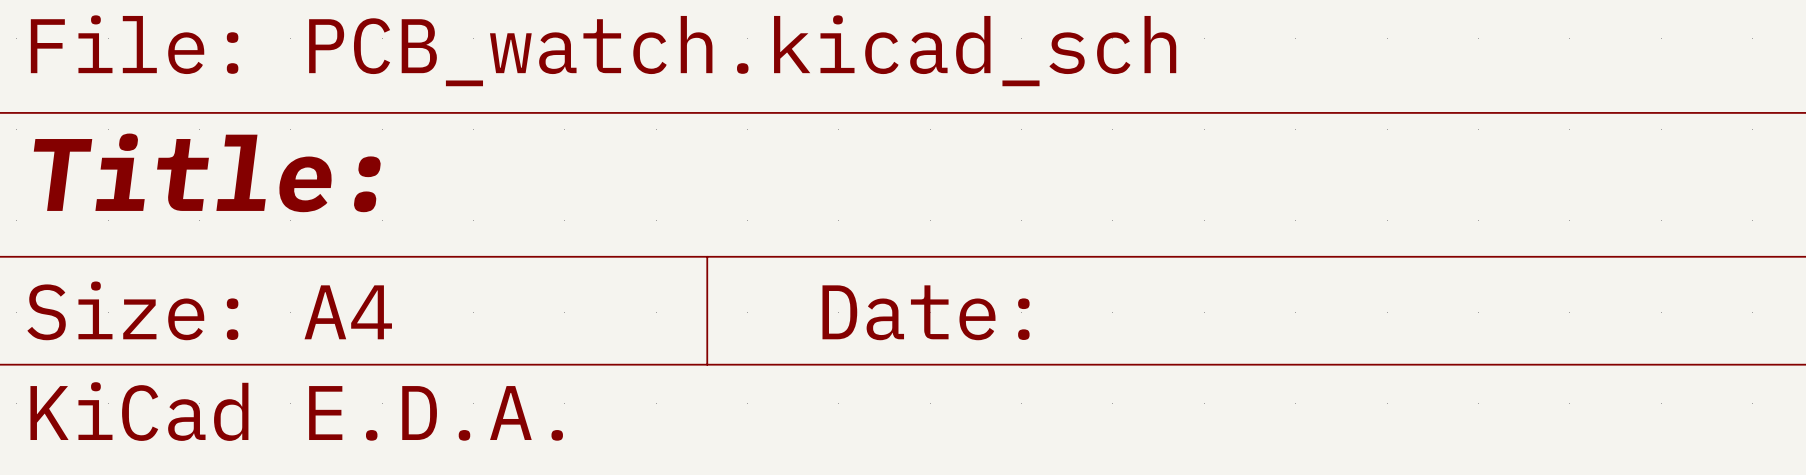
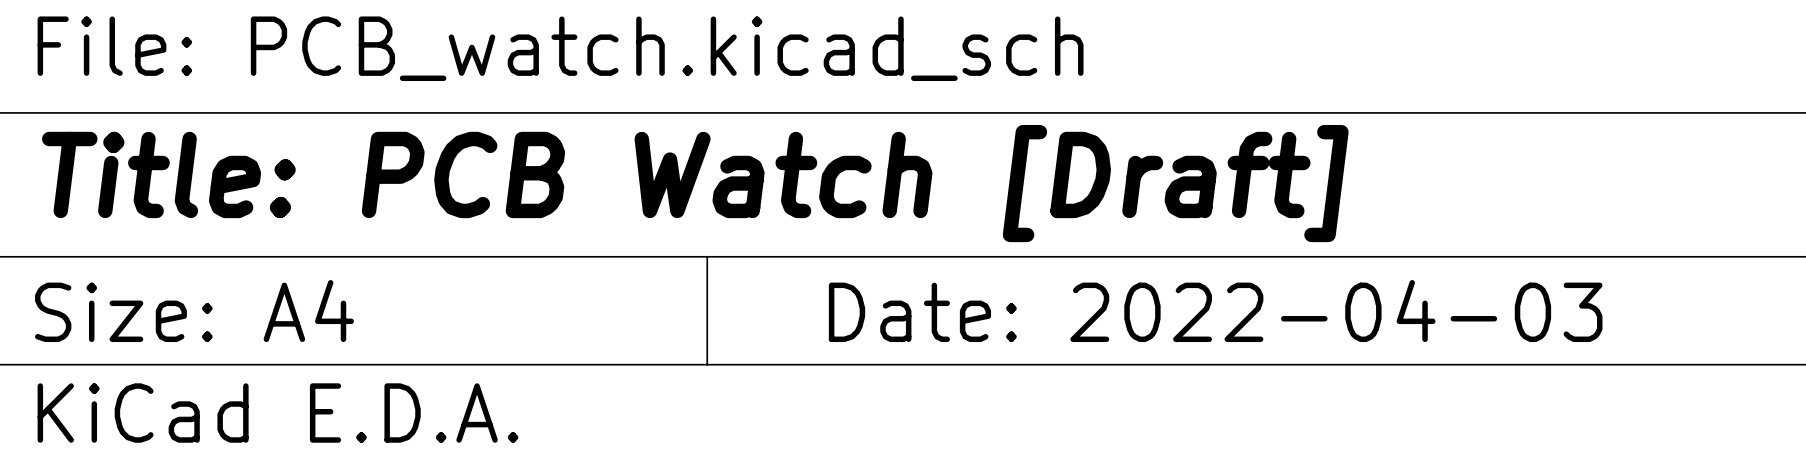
title block: Title: (207, 172) -> Title: PCB Watch [Draft] (695, 183)
title block: Date: (926, 312) -> Date: 2022-04-03 (1215, 311)

